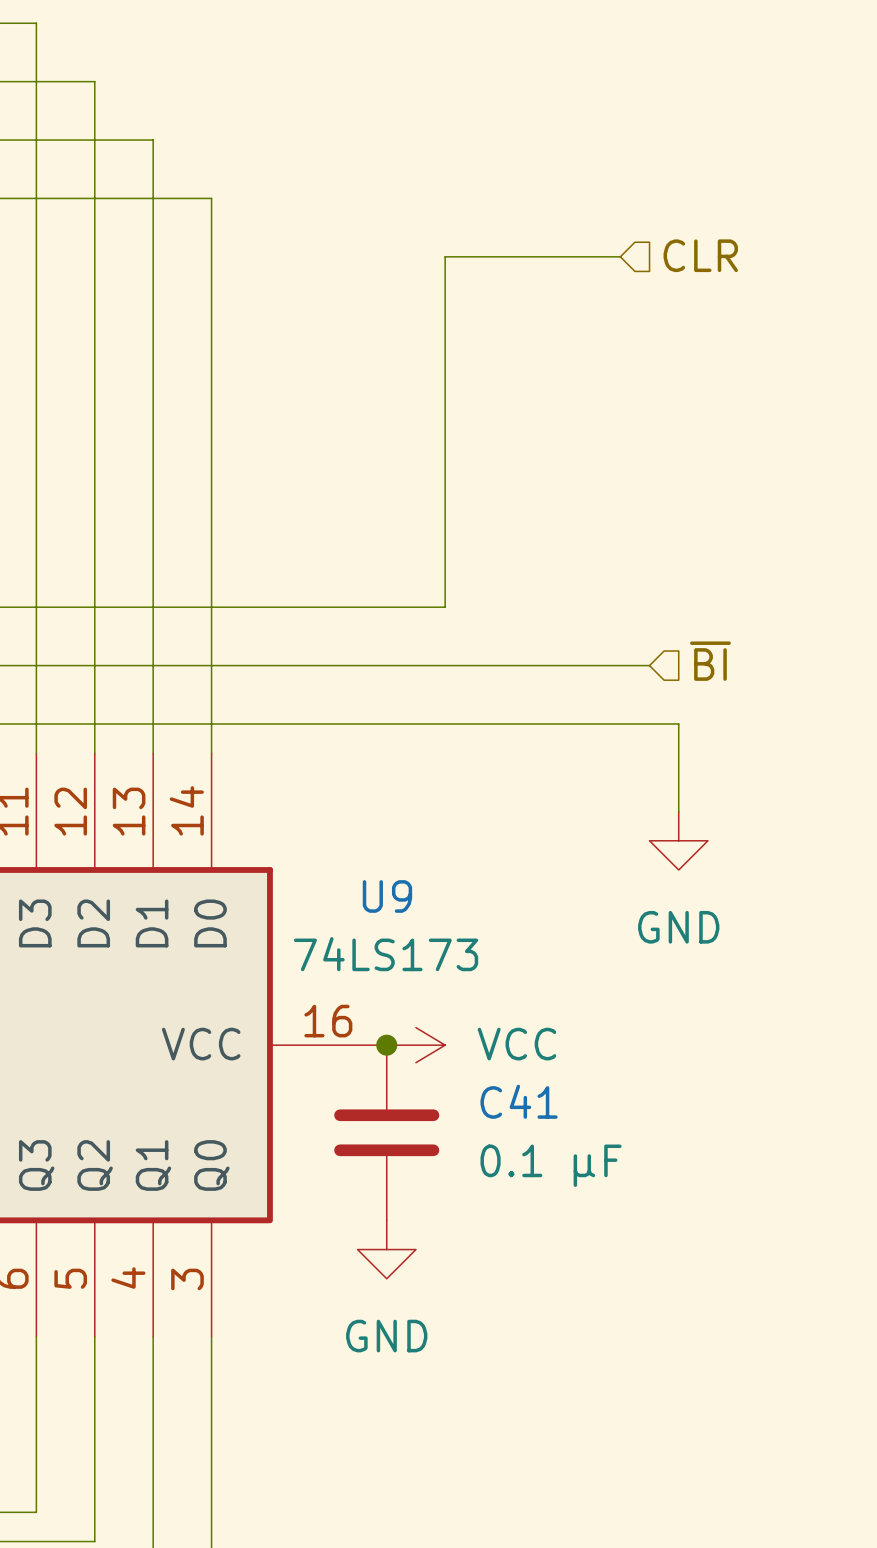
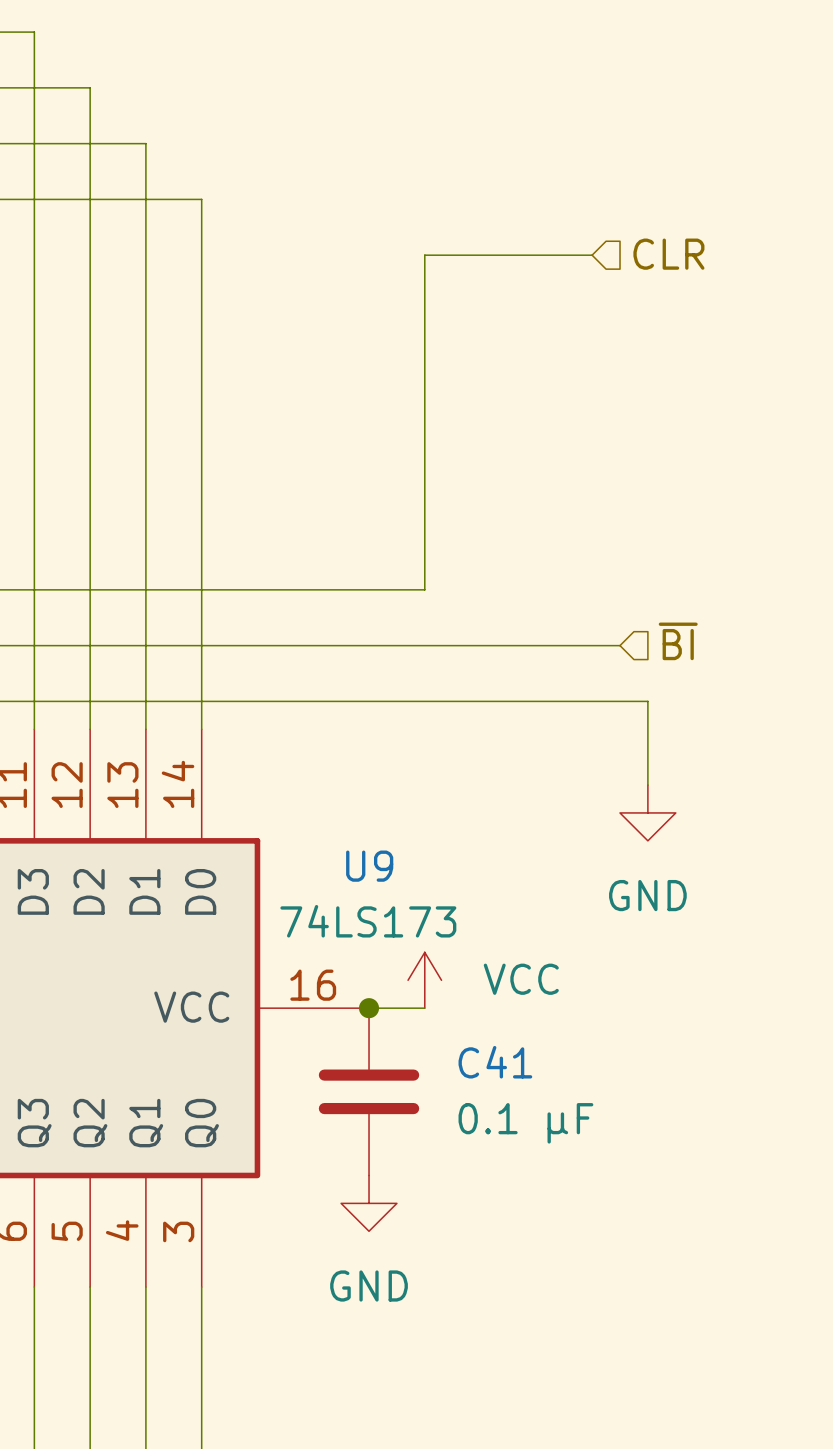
power symbol rotation: 0° (415, 1045) -> 90° counterclockwise (424, 980)
power symbol position: VCC (415, 1045) -> VCC (424, 980)

